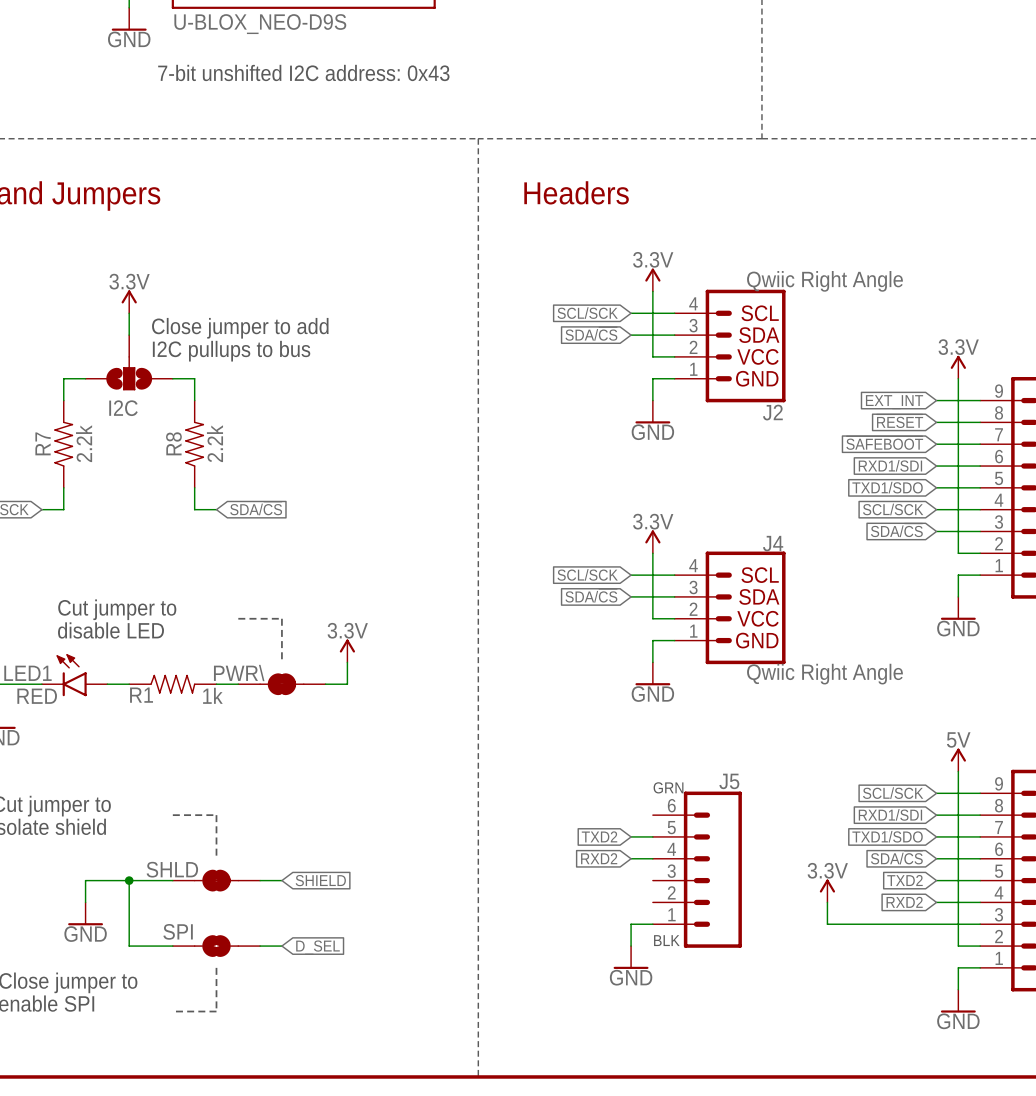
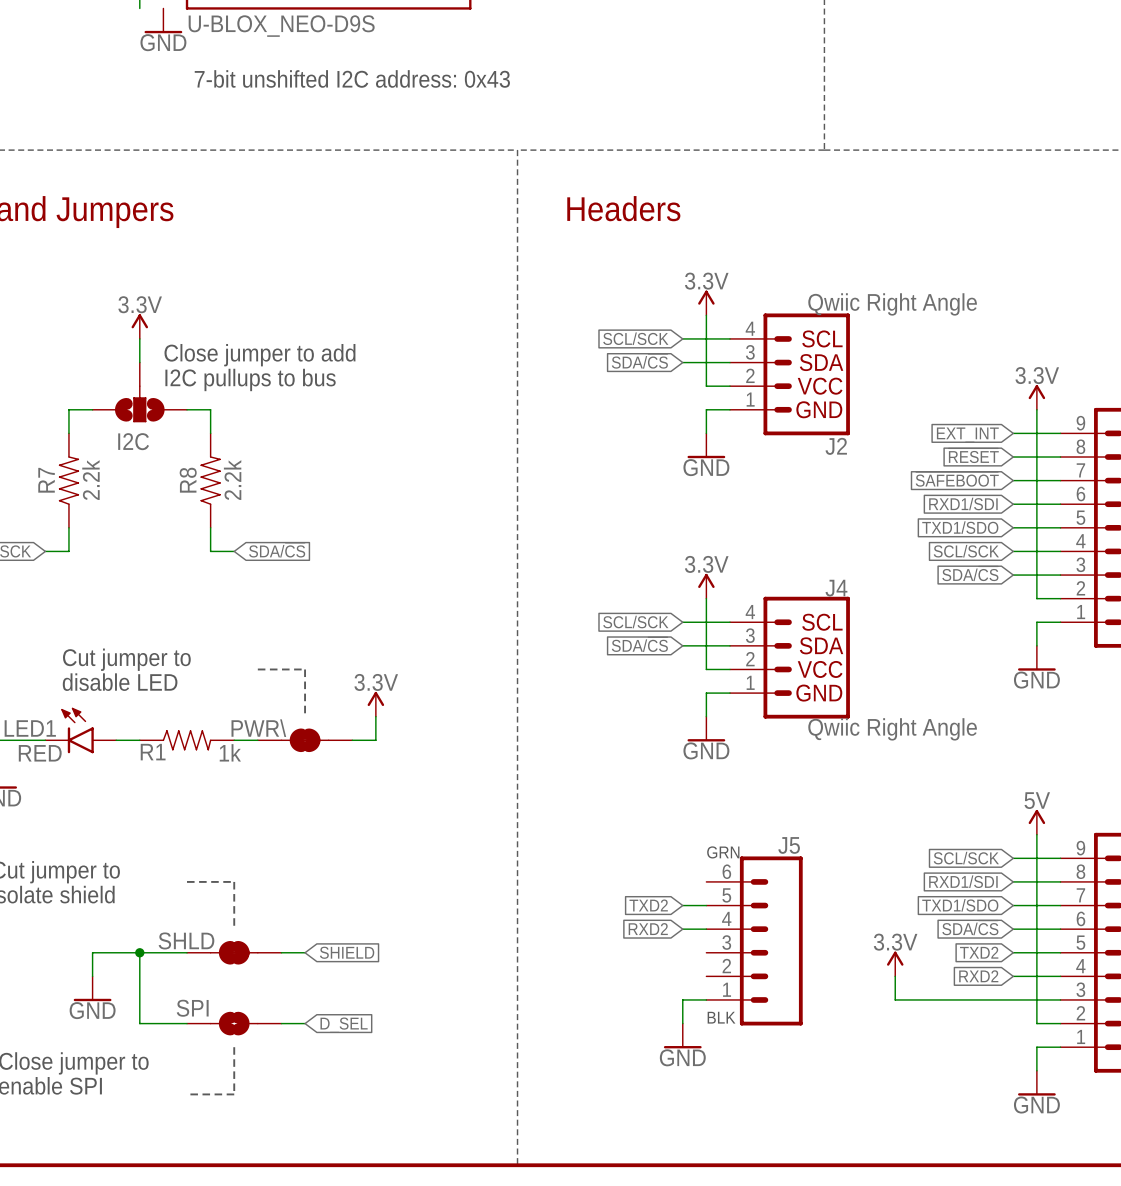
power symbol position: GND (129, 19) -> GND (163, 20)
text position: 7-bit unshifted I2C address: 0x43 (303, 72) -> 7-bit unshifted I2C address: 0x43 (352, 78)

